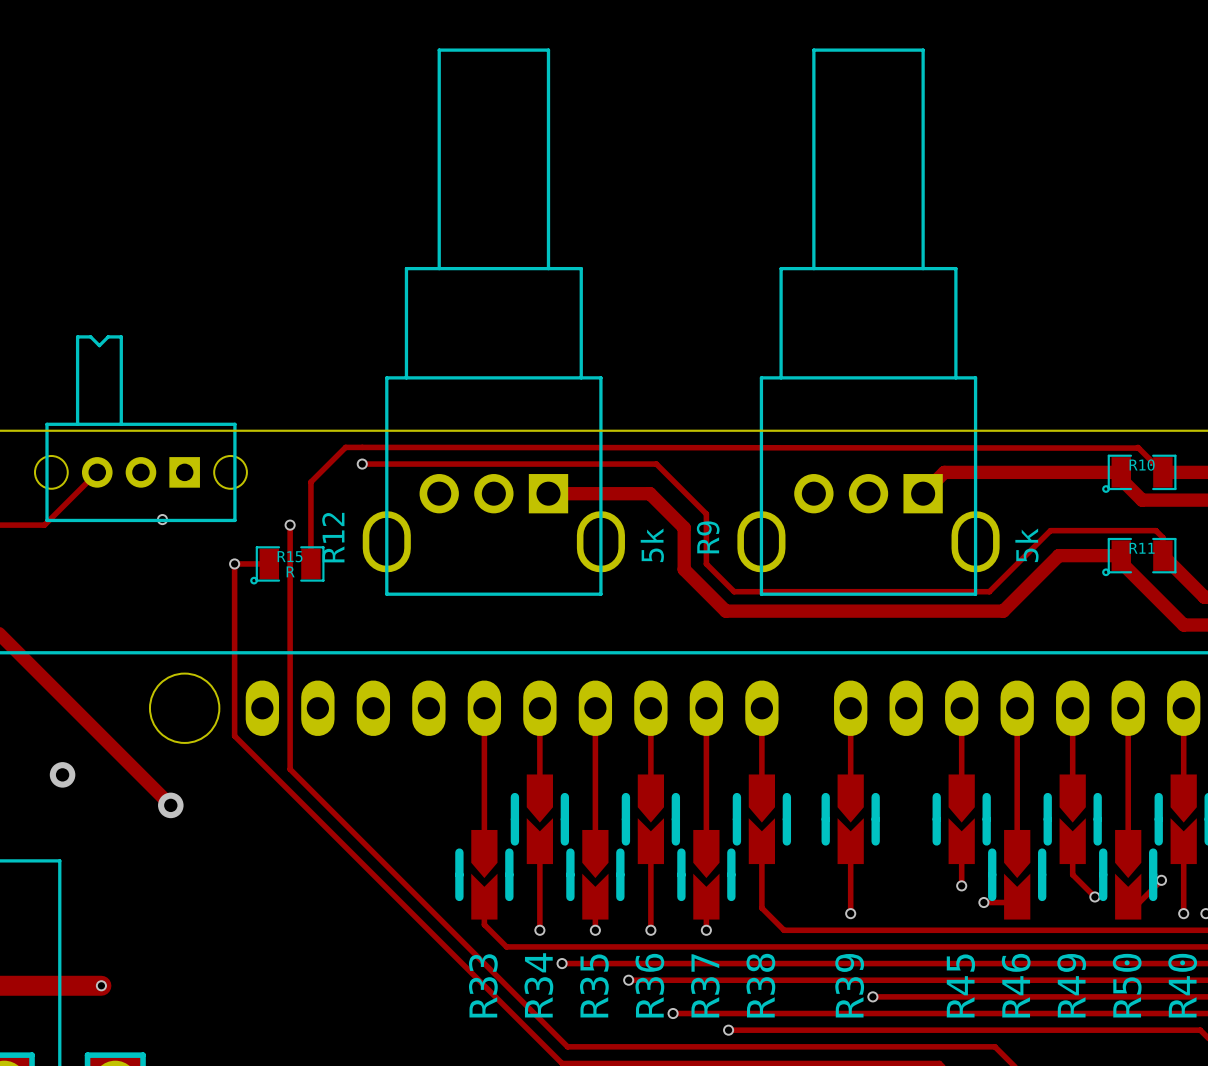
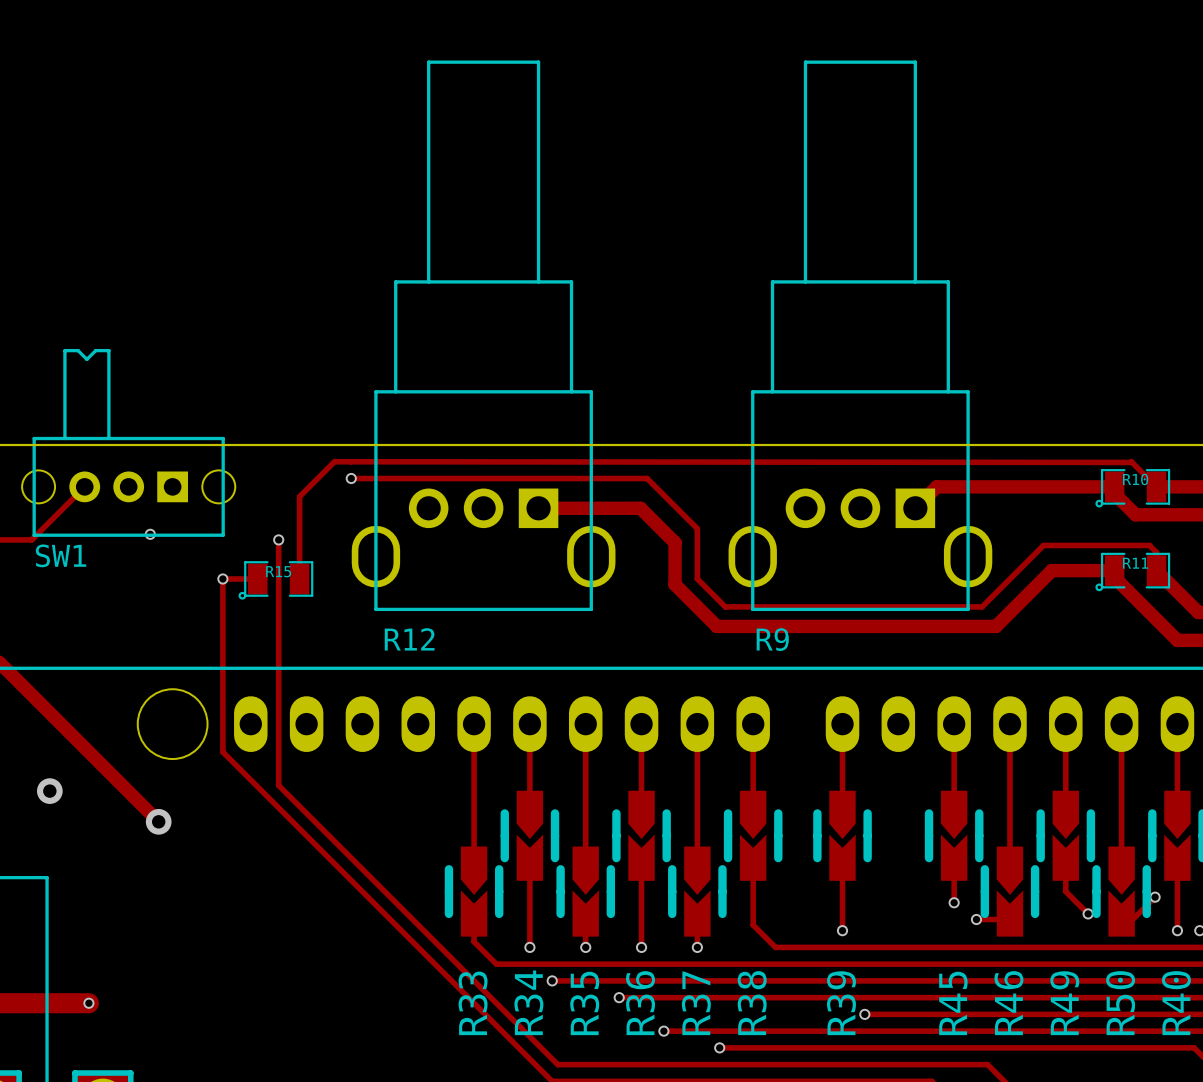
R12 name rotation: 0° (333, 537) -> 90° clockwise (409, 639)
R12 name position: R12 (333, 537) -> R12 (409, 639)
R9 name rotation: 0° (708, 537) -> 90° clockwise (772, 639)
R9 name position: R9 (708, 537) -> R9 (772, 639)
SW1 name: none -> SW1 (60, 555)
R12 value: 5k (652, 545) -> none
R9 value: 5k (1026, 545) -> none
R15 value: R (290, 571) -> none

